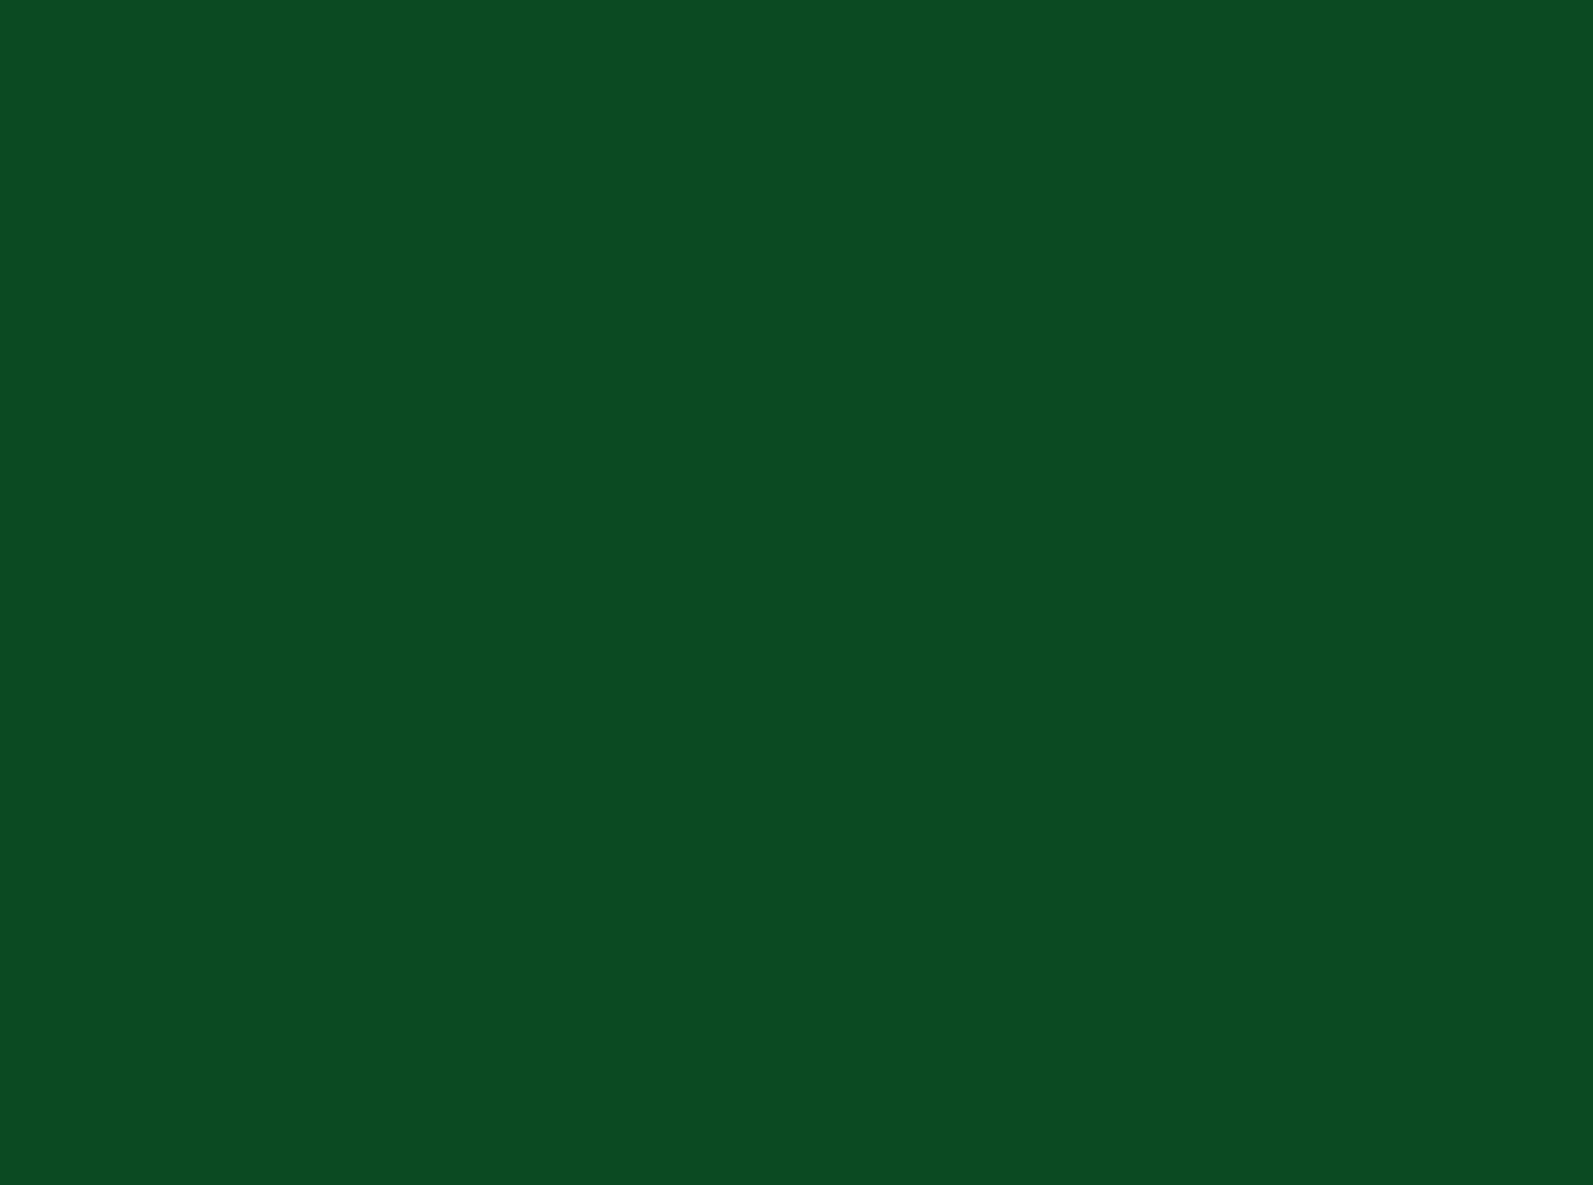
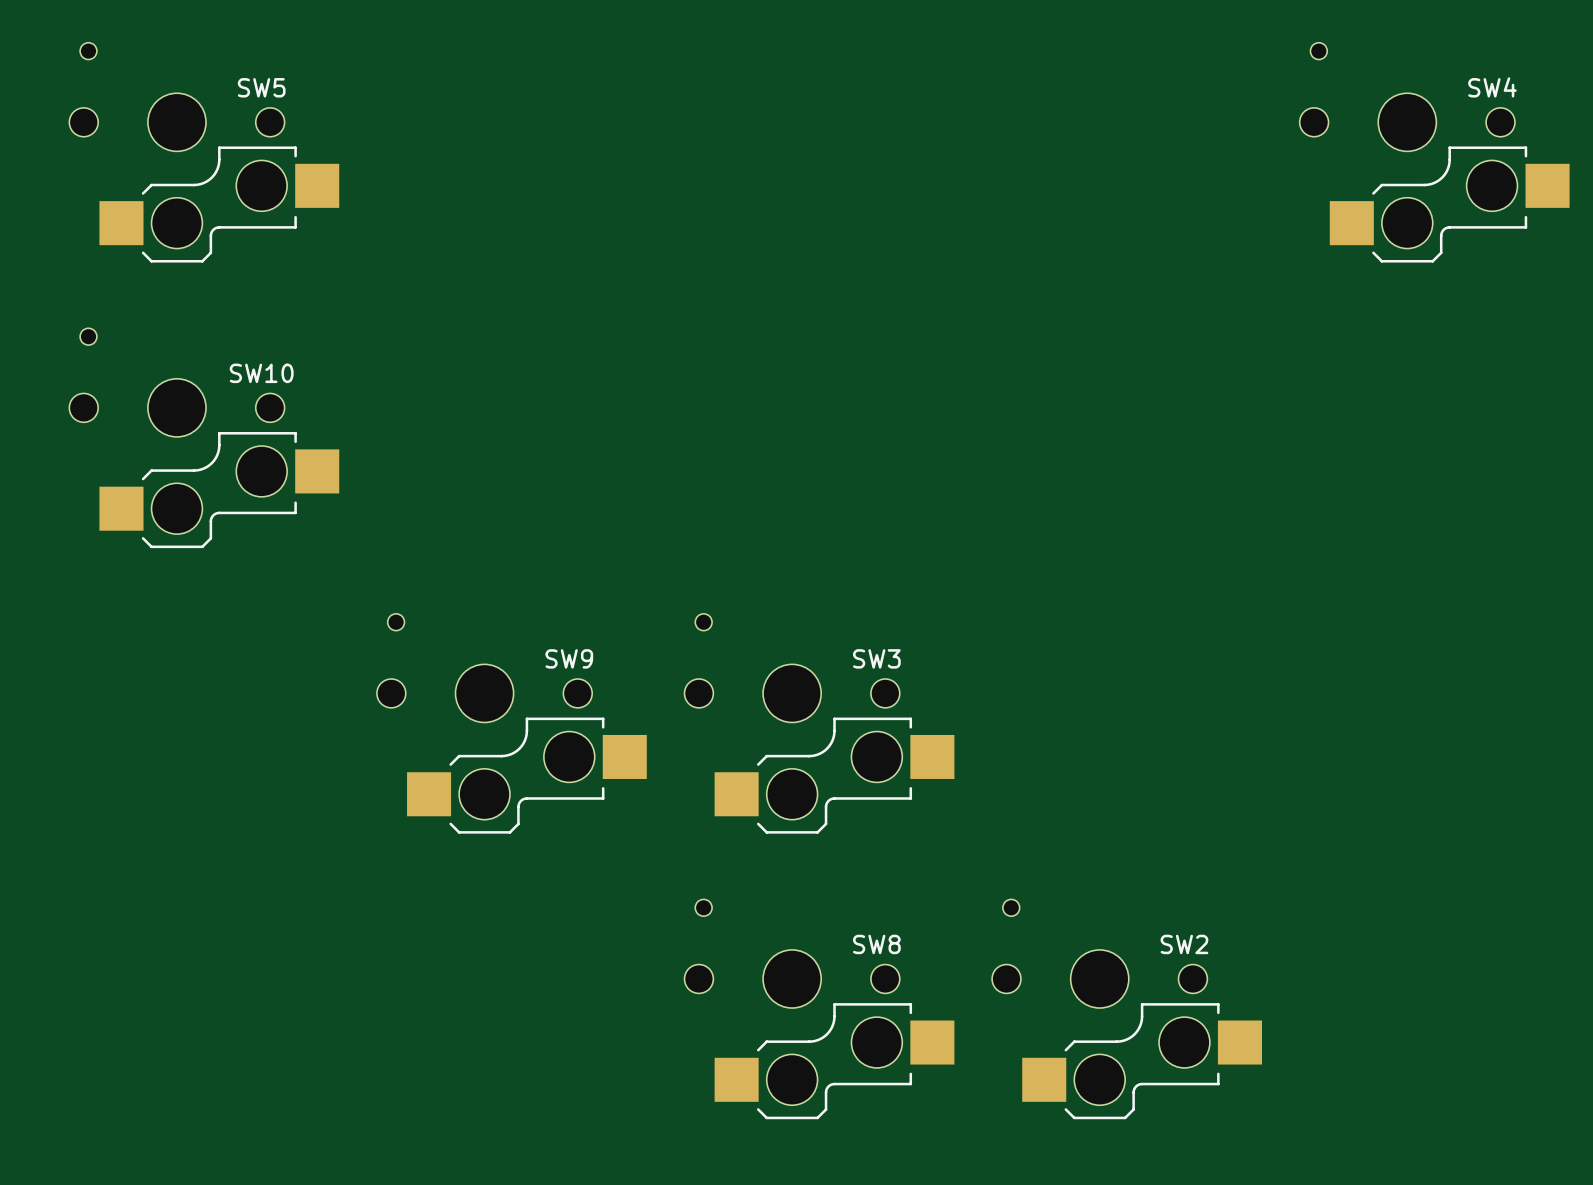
SW5: none -> (204, 152)
SW4: none -> (1434, 152)
SW10: none -> (204, 438)
SW9: none -> (511, 723)
SW3: none -> (819, 723)
SW8: none -> (819, 1009)
SW2: none -> (1127, 1009)

